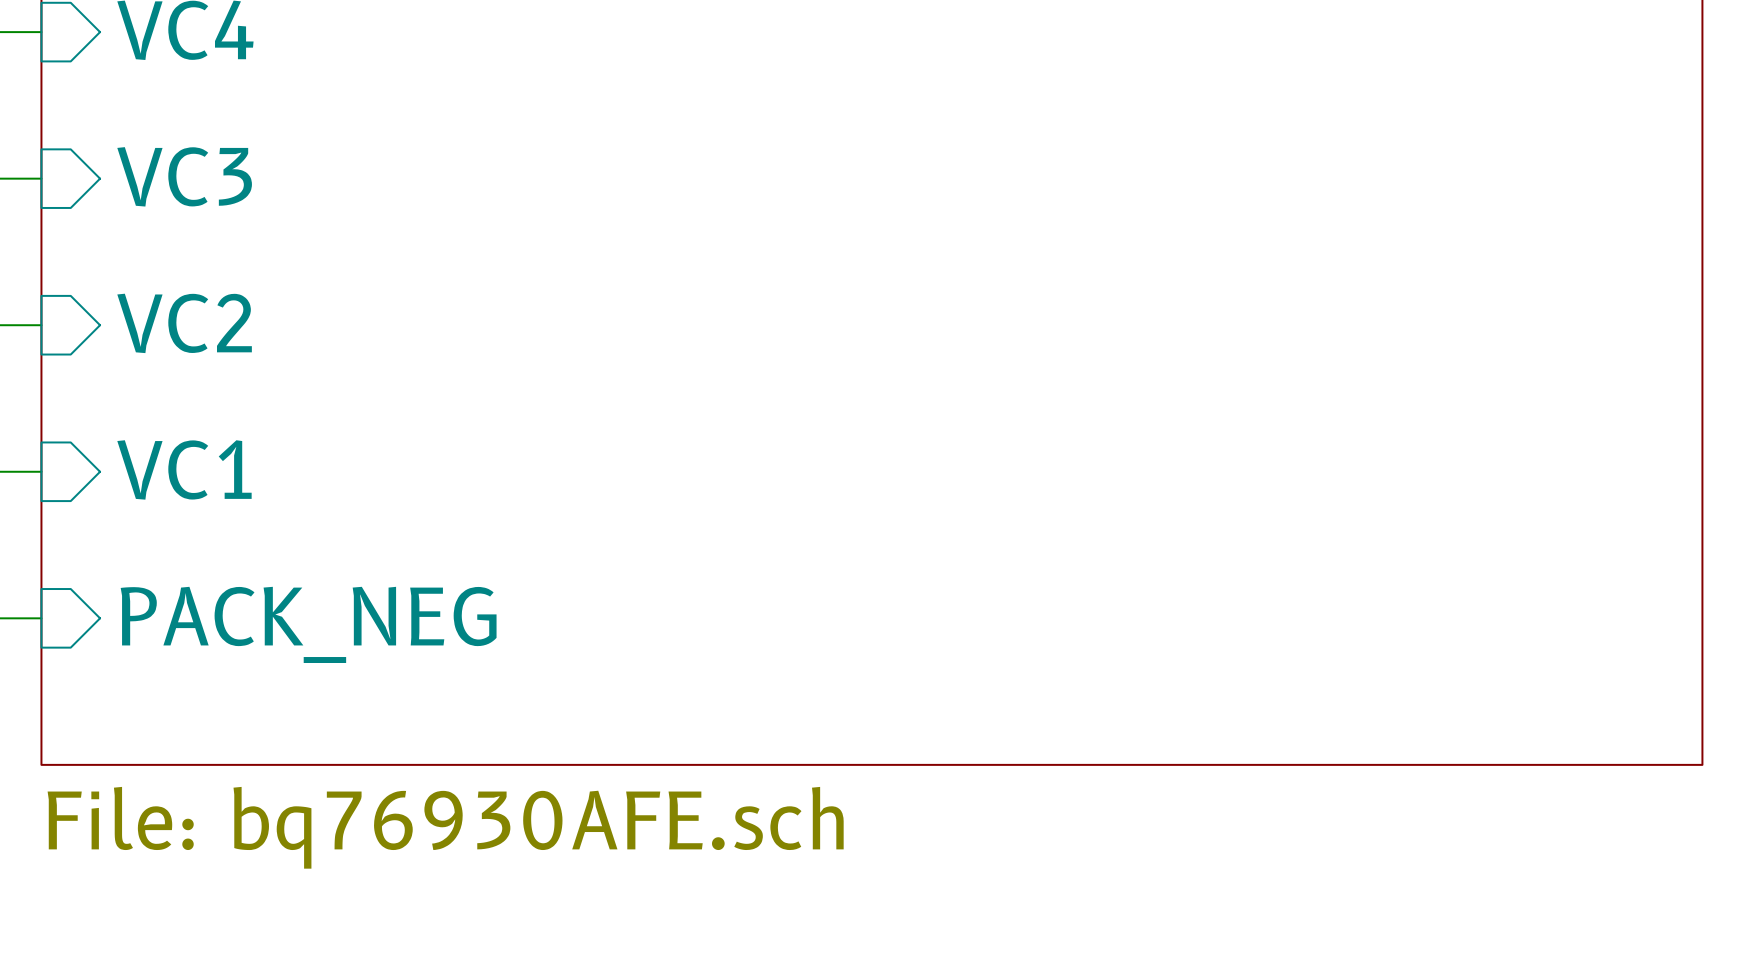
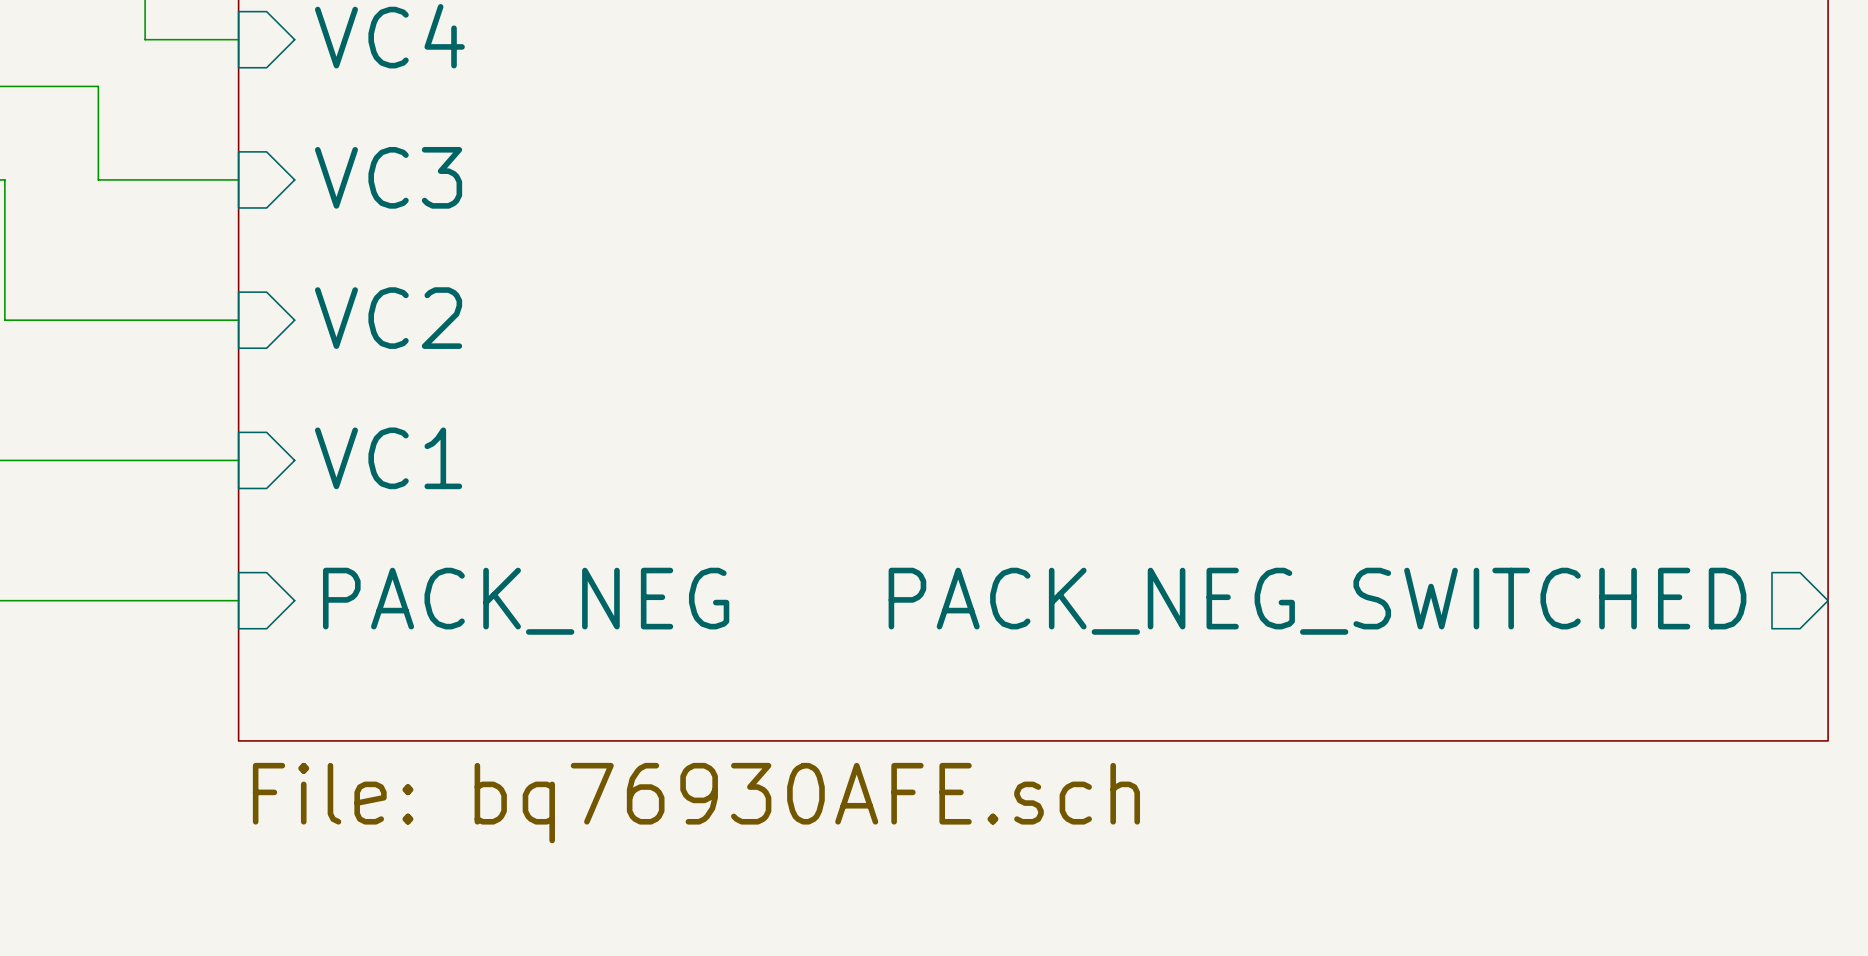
sheet pin: none -> PACK_NEG_SWITCHED (1317, 601)

